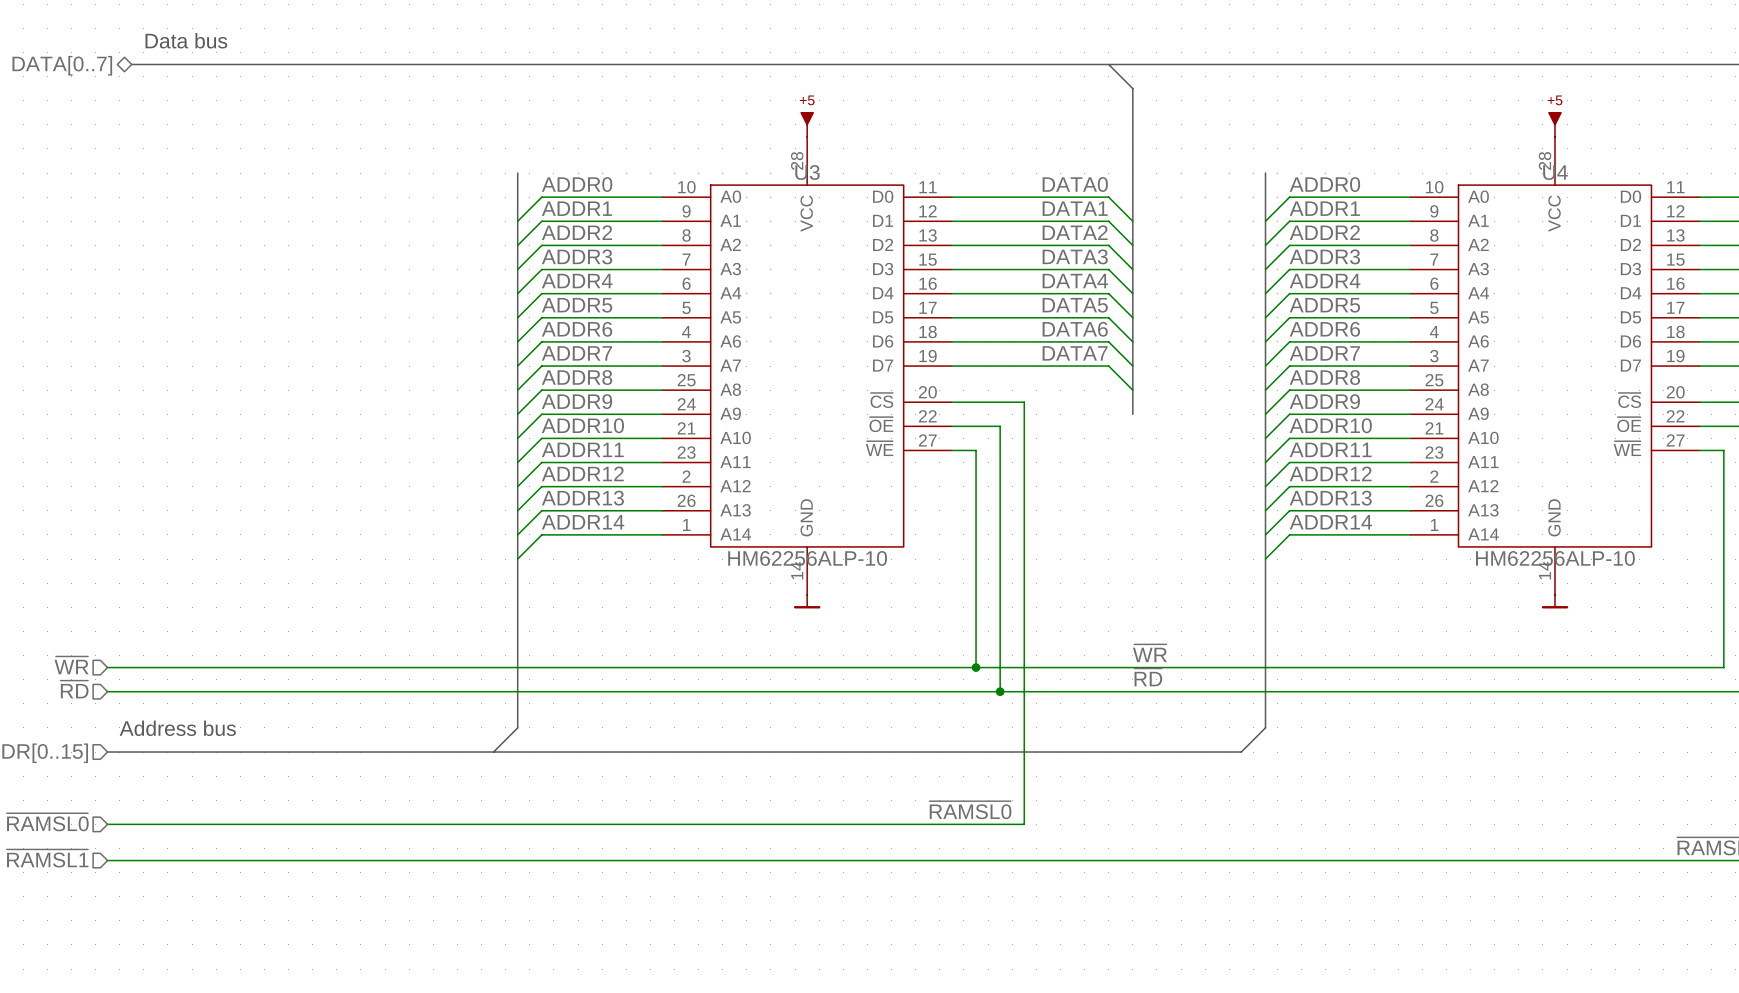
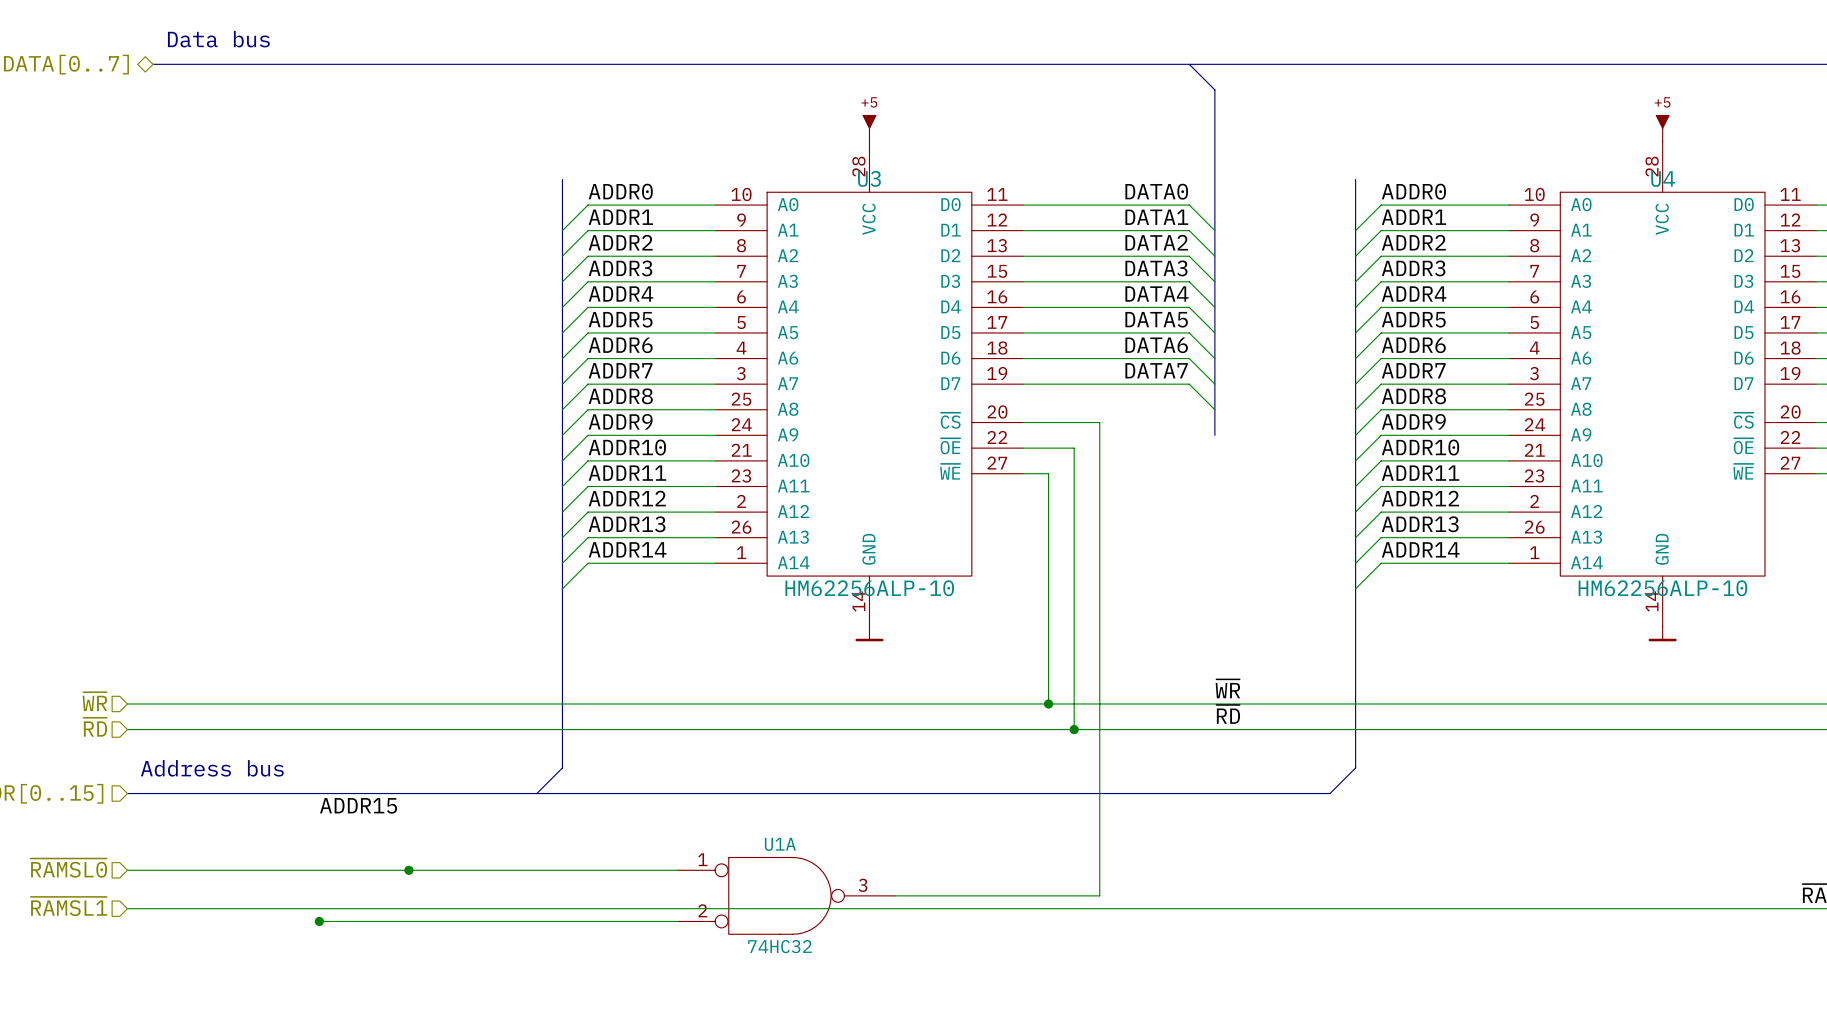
label: none -> ADDR15 (358, 805)
label: ~{RAMSL0} (970, 810) -> none
junction: none -> (408, 870)
wire: (626, 824) (1024, 824) -> (895, 895) (1099, 895) (1099, 870)
U1A: none -> 74HC32 (786, 895)
wire: none -> (319, 921) (677, 921)
junction: none -> (319, 921)

